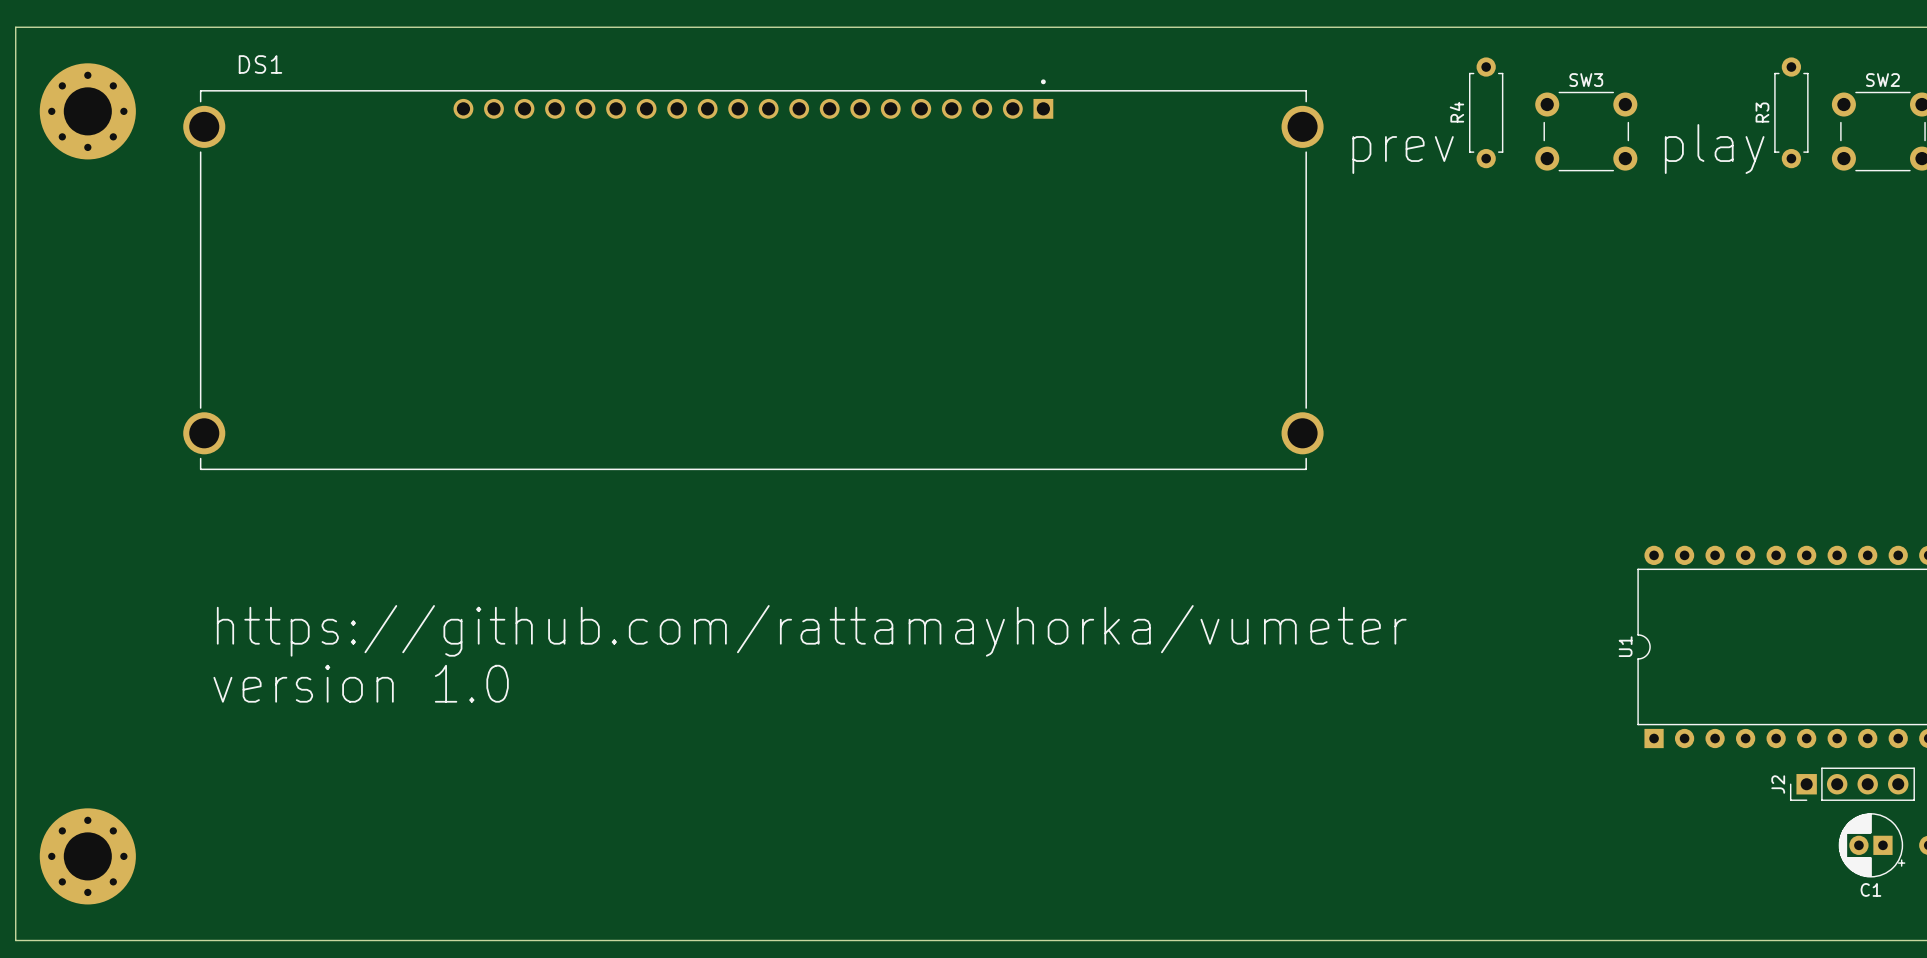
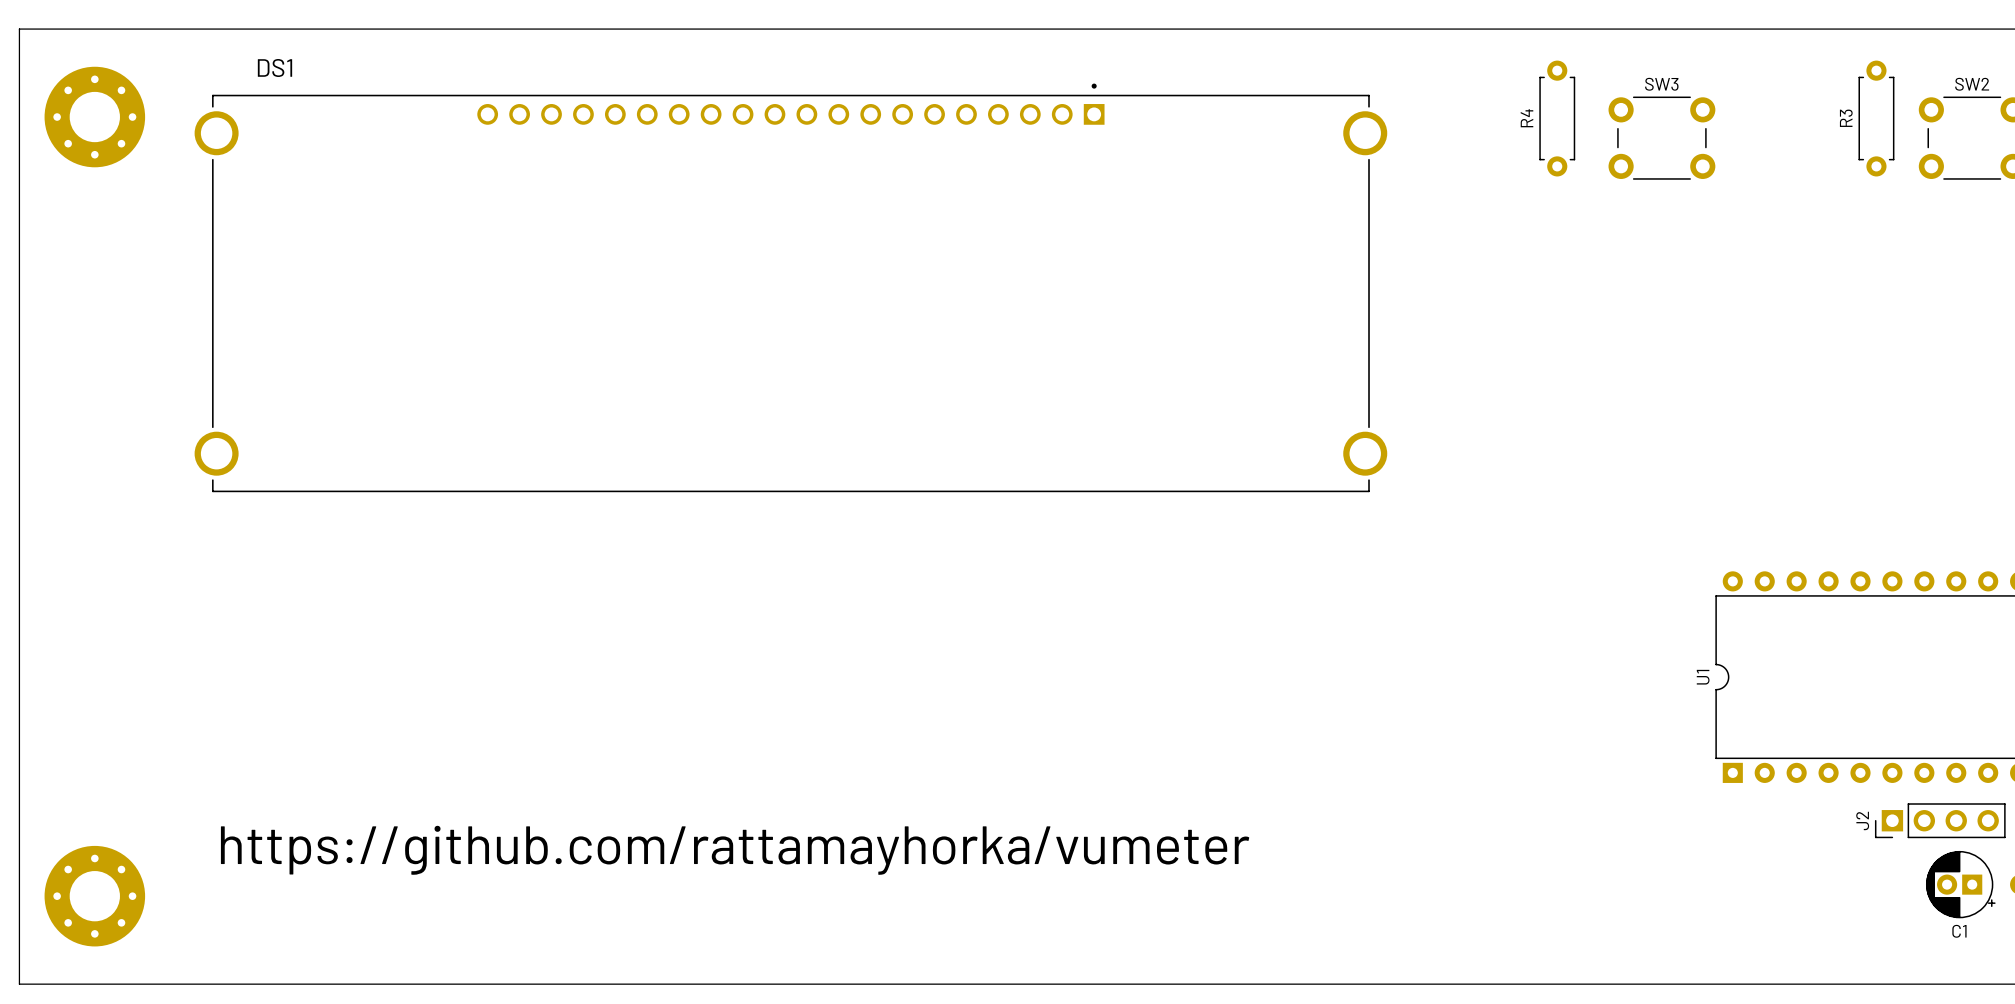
text: play (1714, 149) -> none
text: prev (1403, 155) -> none
text position: https://github.com/rattamayhorka/vumeter (811, 630) -> https://github.com/rattamayhorka/vumeter (735, 850)
text: version 1.0 (361, 683) -> none

